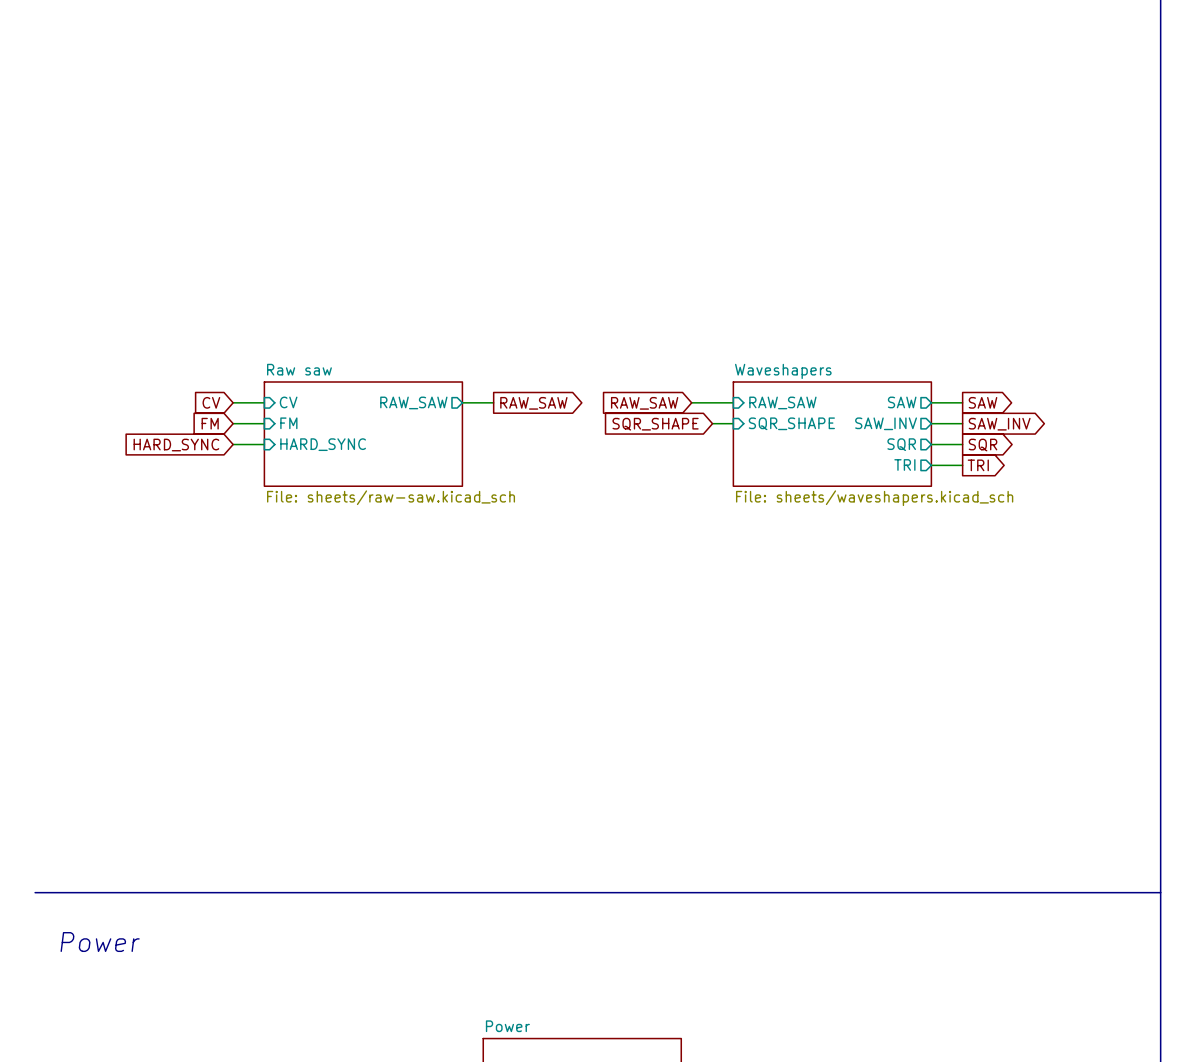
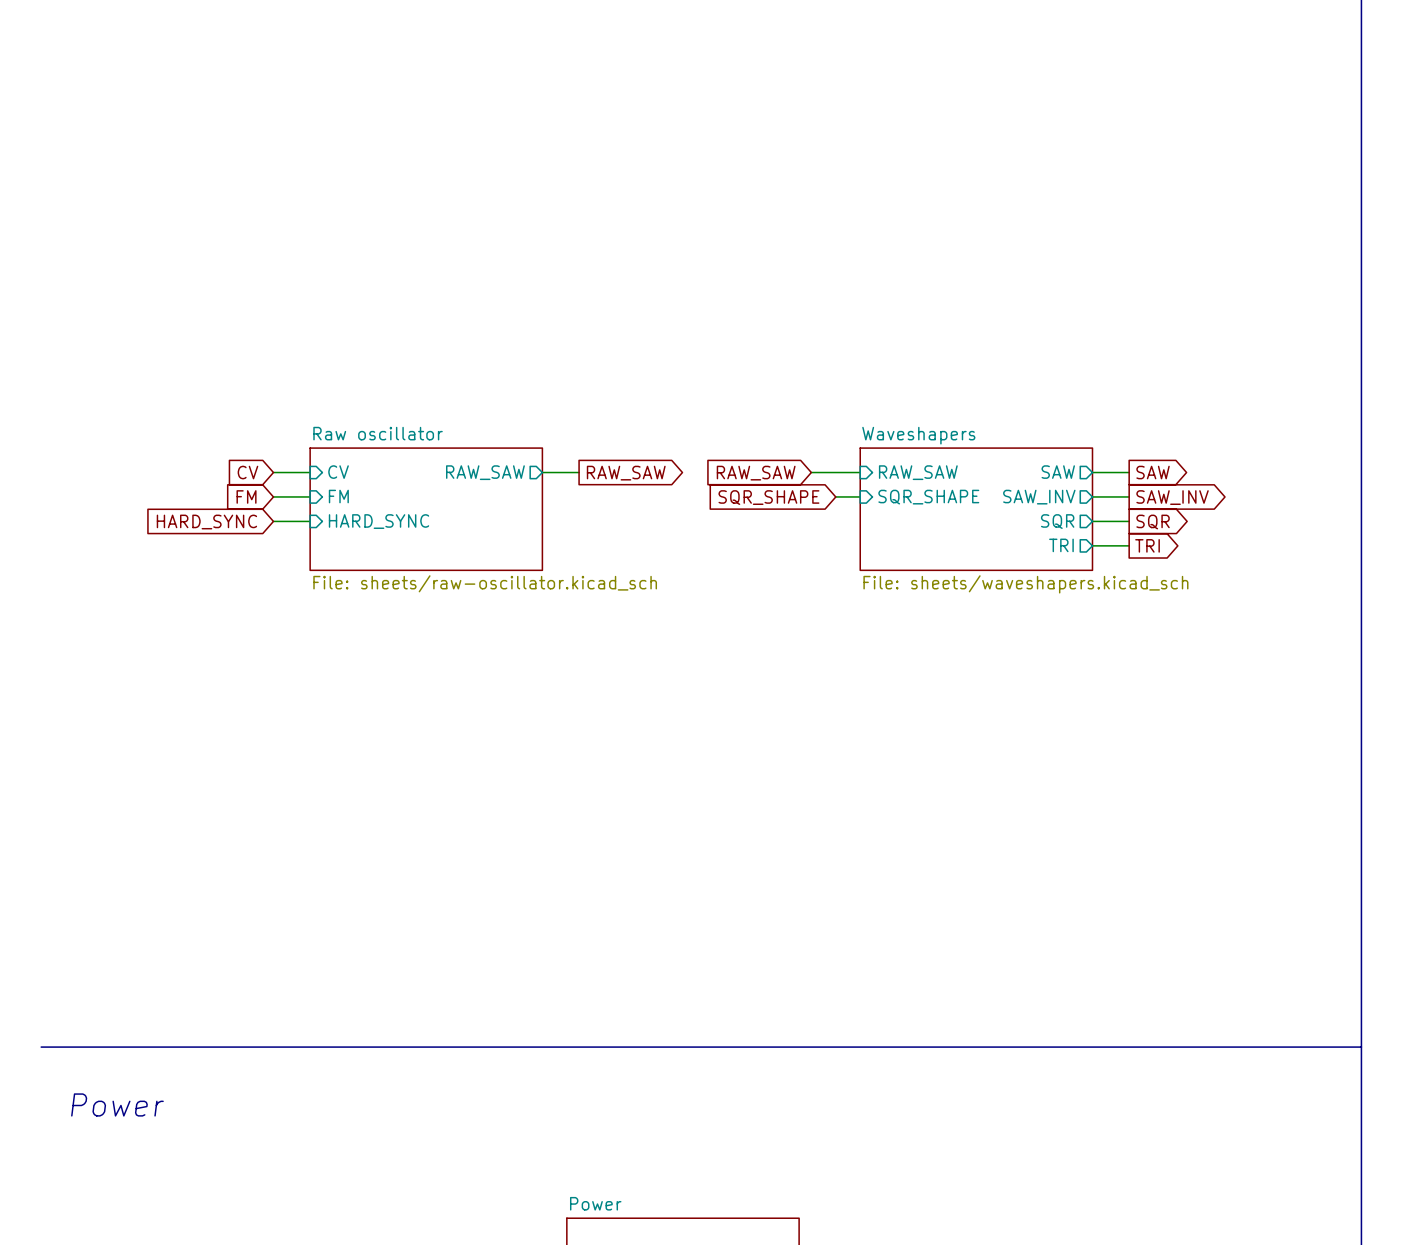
sheet Raw saw name: Raw saw (299, 369) -> Raw oscillator (378, 433)
sheet Raw saw value: File: sheets/raw-saw.kicad_sch (391, 497) -> File: sheets/raw-oscillator.kicad_sch (485, 583)

